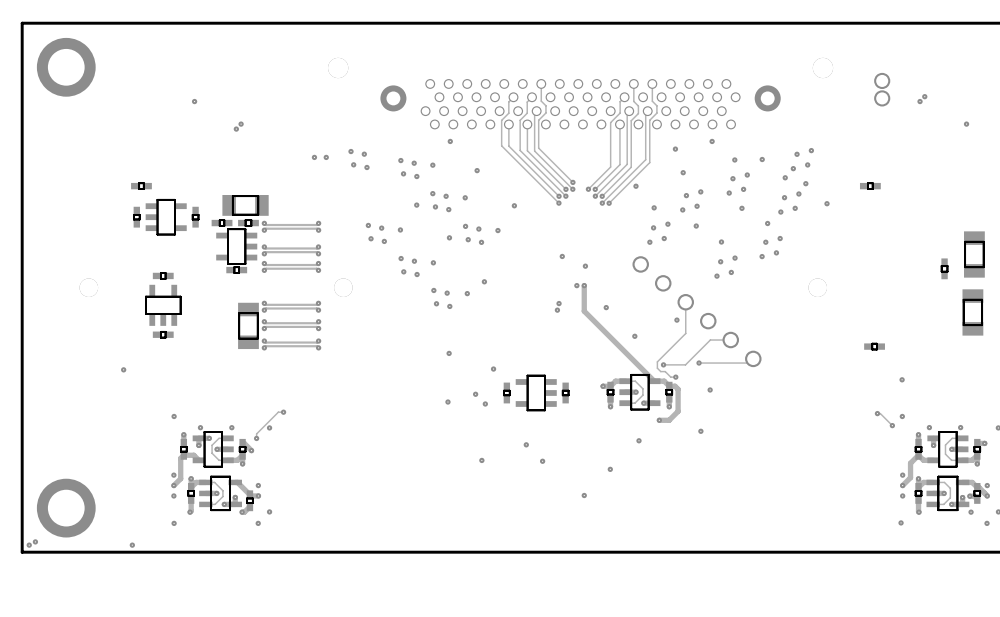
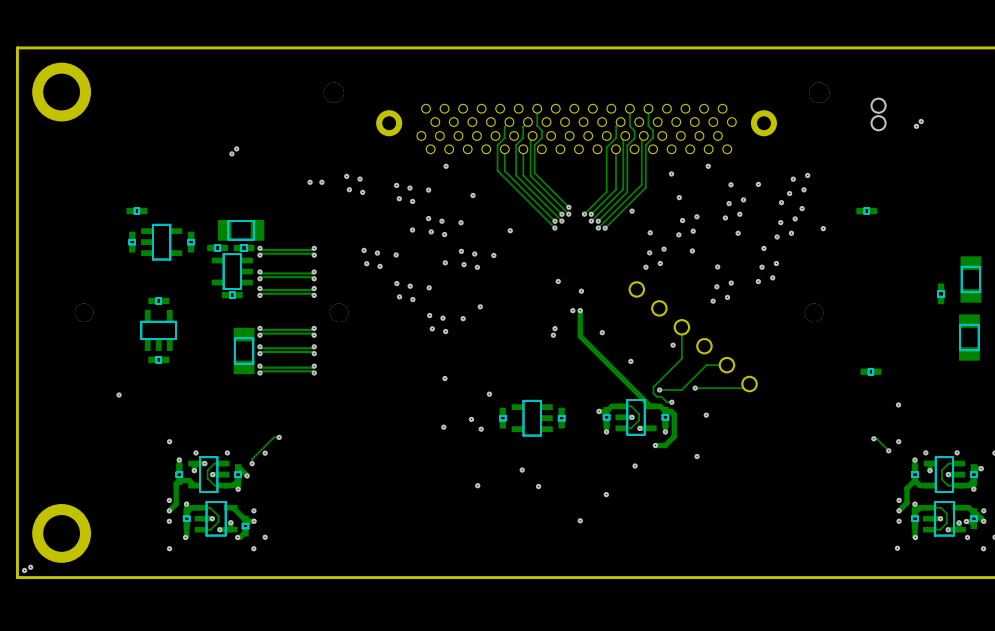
via: (194, 101) -> none
via: (966, 124) -> none
via: (132, 545) -> none

